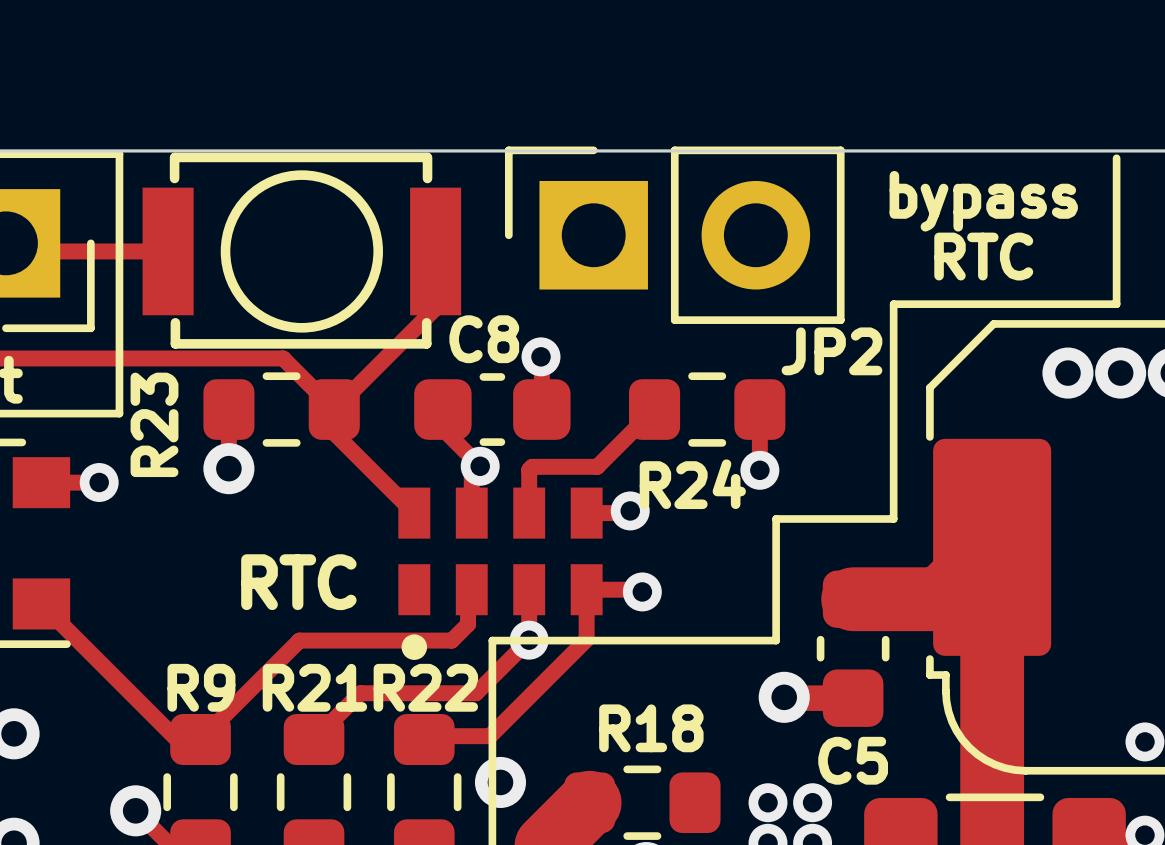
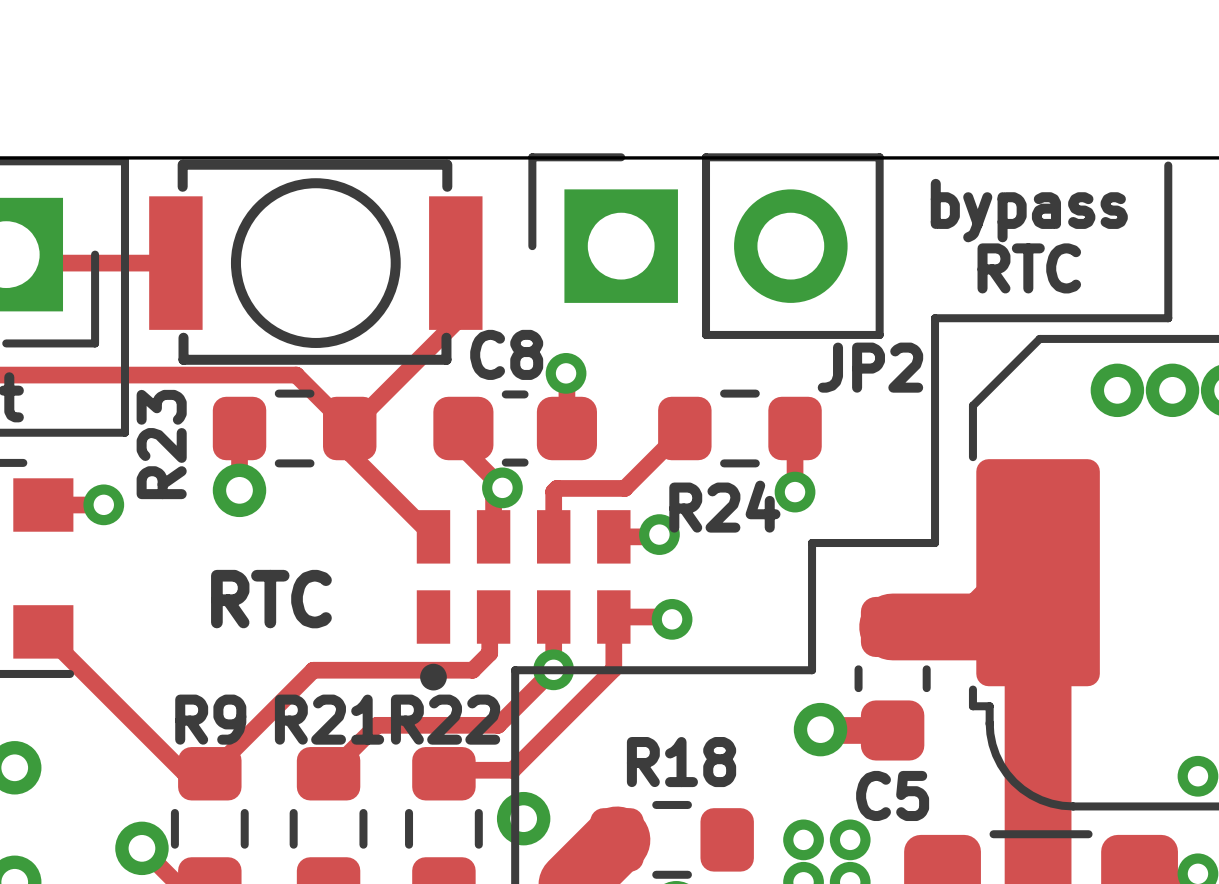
text position: RTC (298, 582) -> RTC (271, 599)

